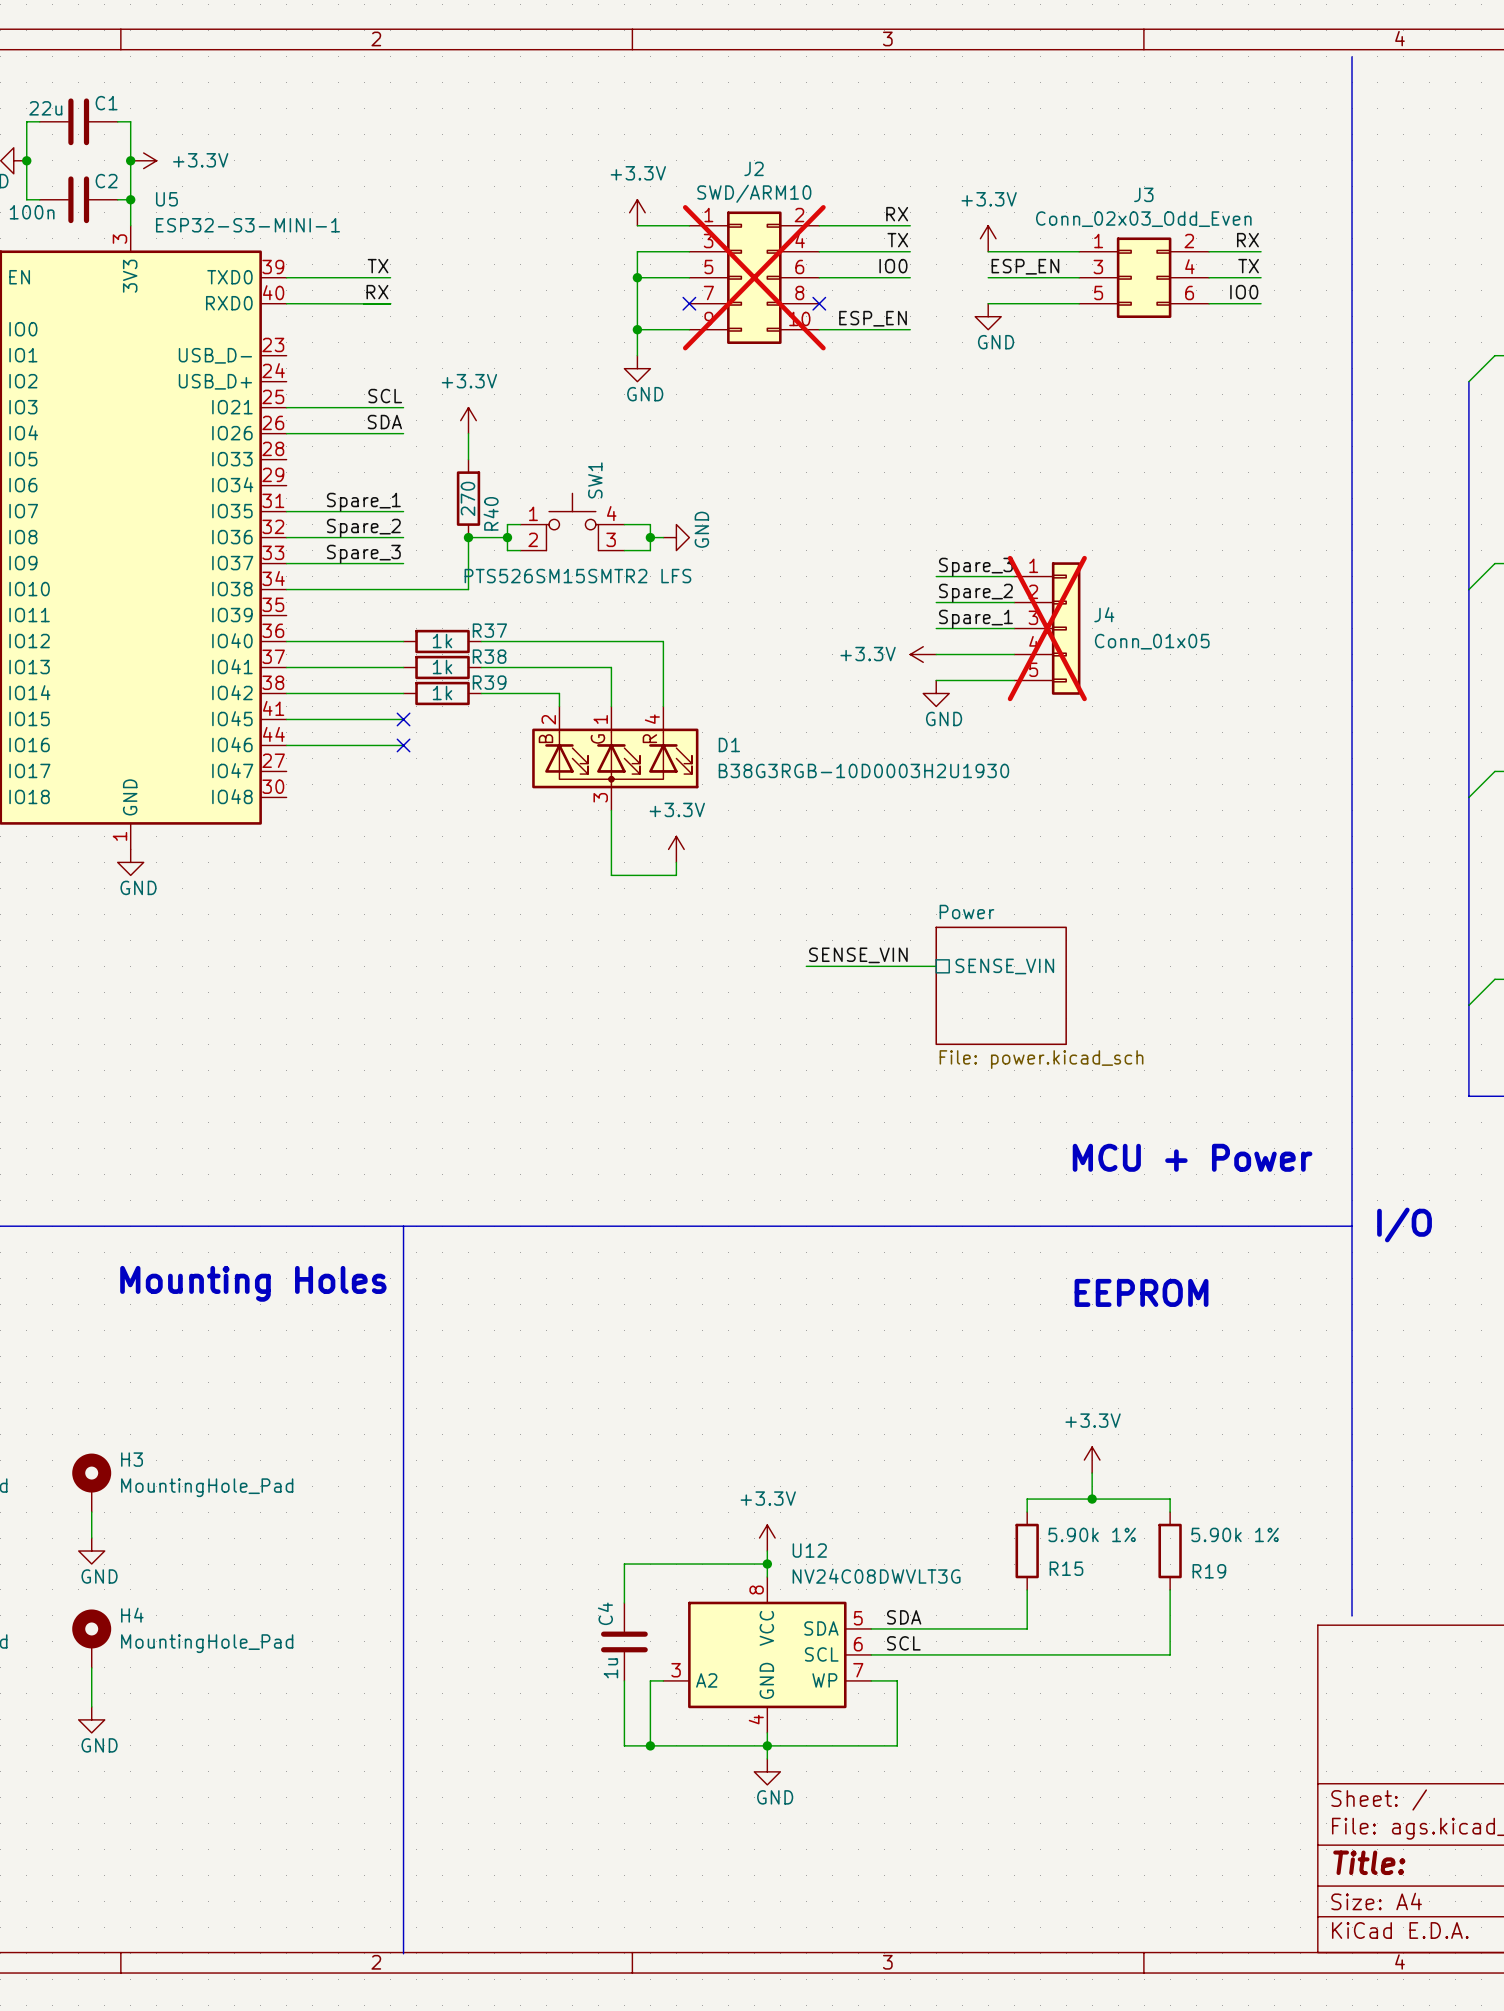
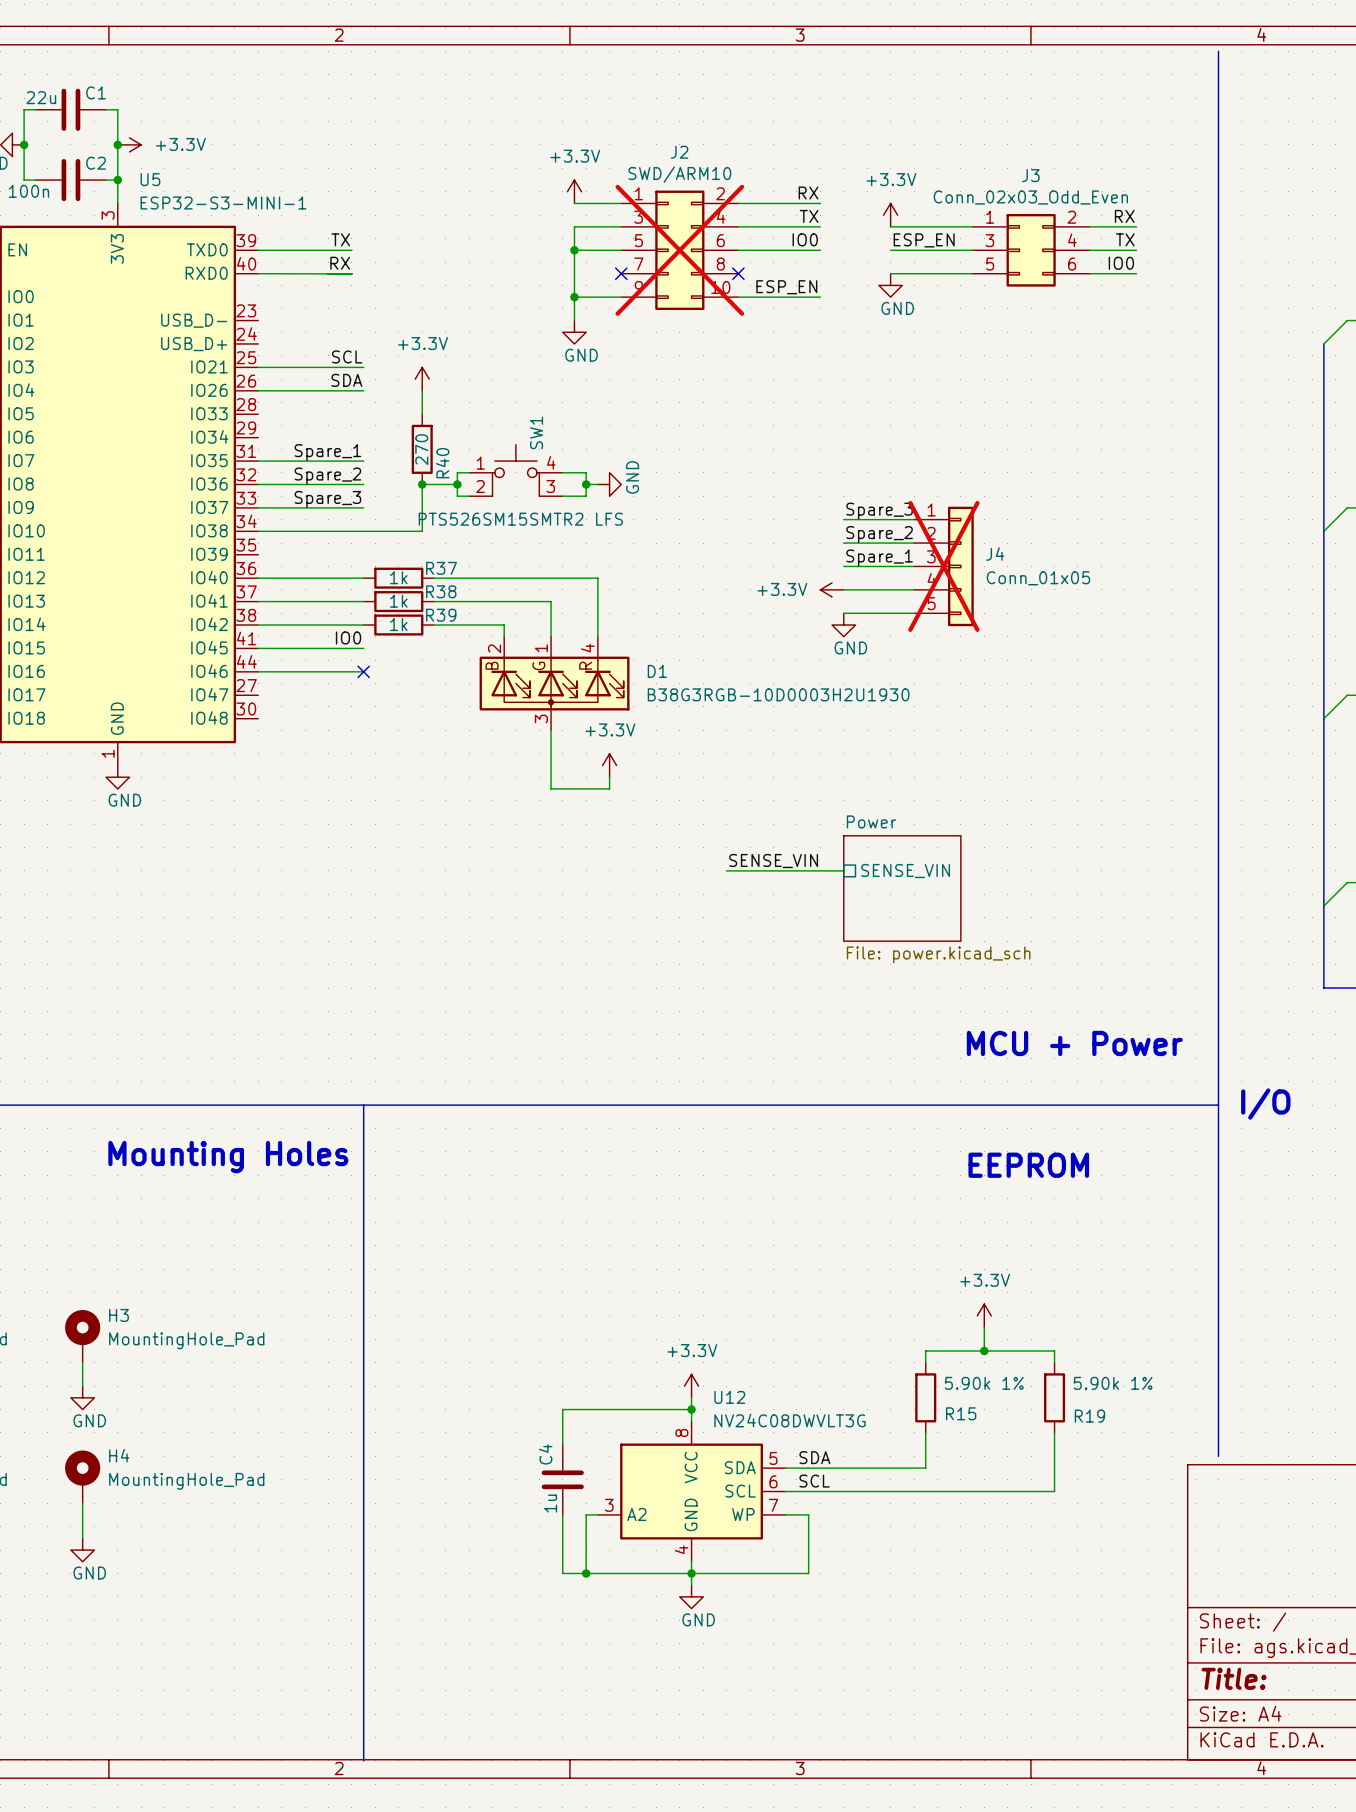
label: none -> IO0 (348, 637)
no-connect mark: (403, 719) -> none

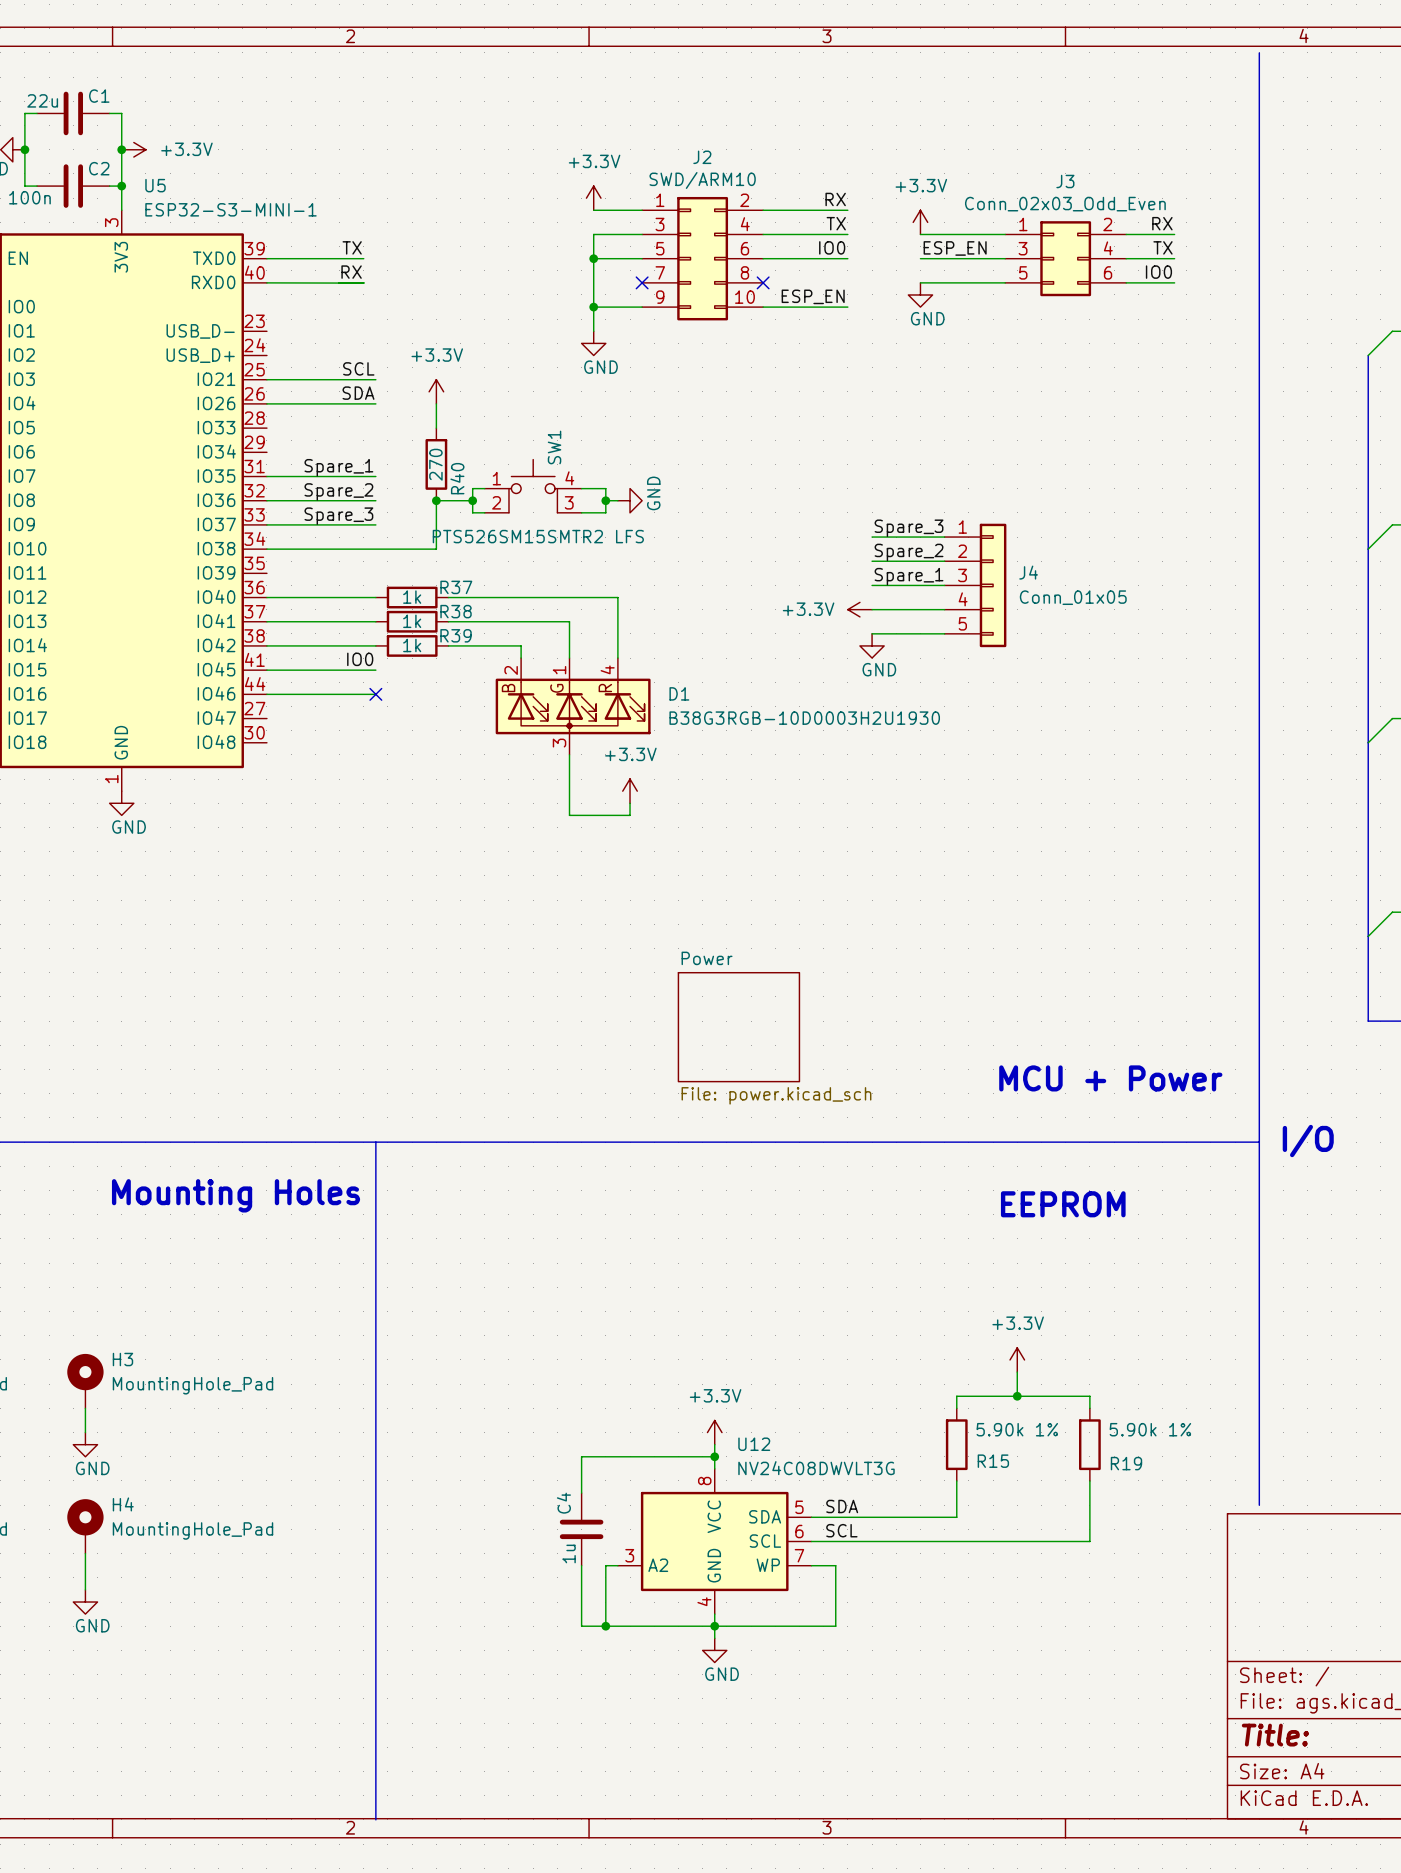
J2 do-not-place cross: (679, 250) -> none
J4 do-not-place cross: (943, 566) -> none
label: SENSE_VIN (773, 861) -> none
wire: (726, 870) (843, 870) -> none
sheet pin: SENSE_VIN (905, 871) -> none
sheet Power position: (902, 888) -> (738, 1027)

